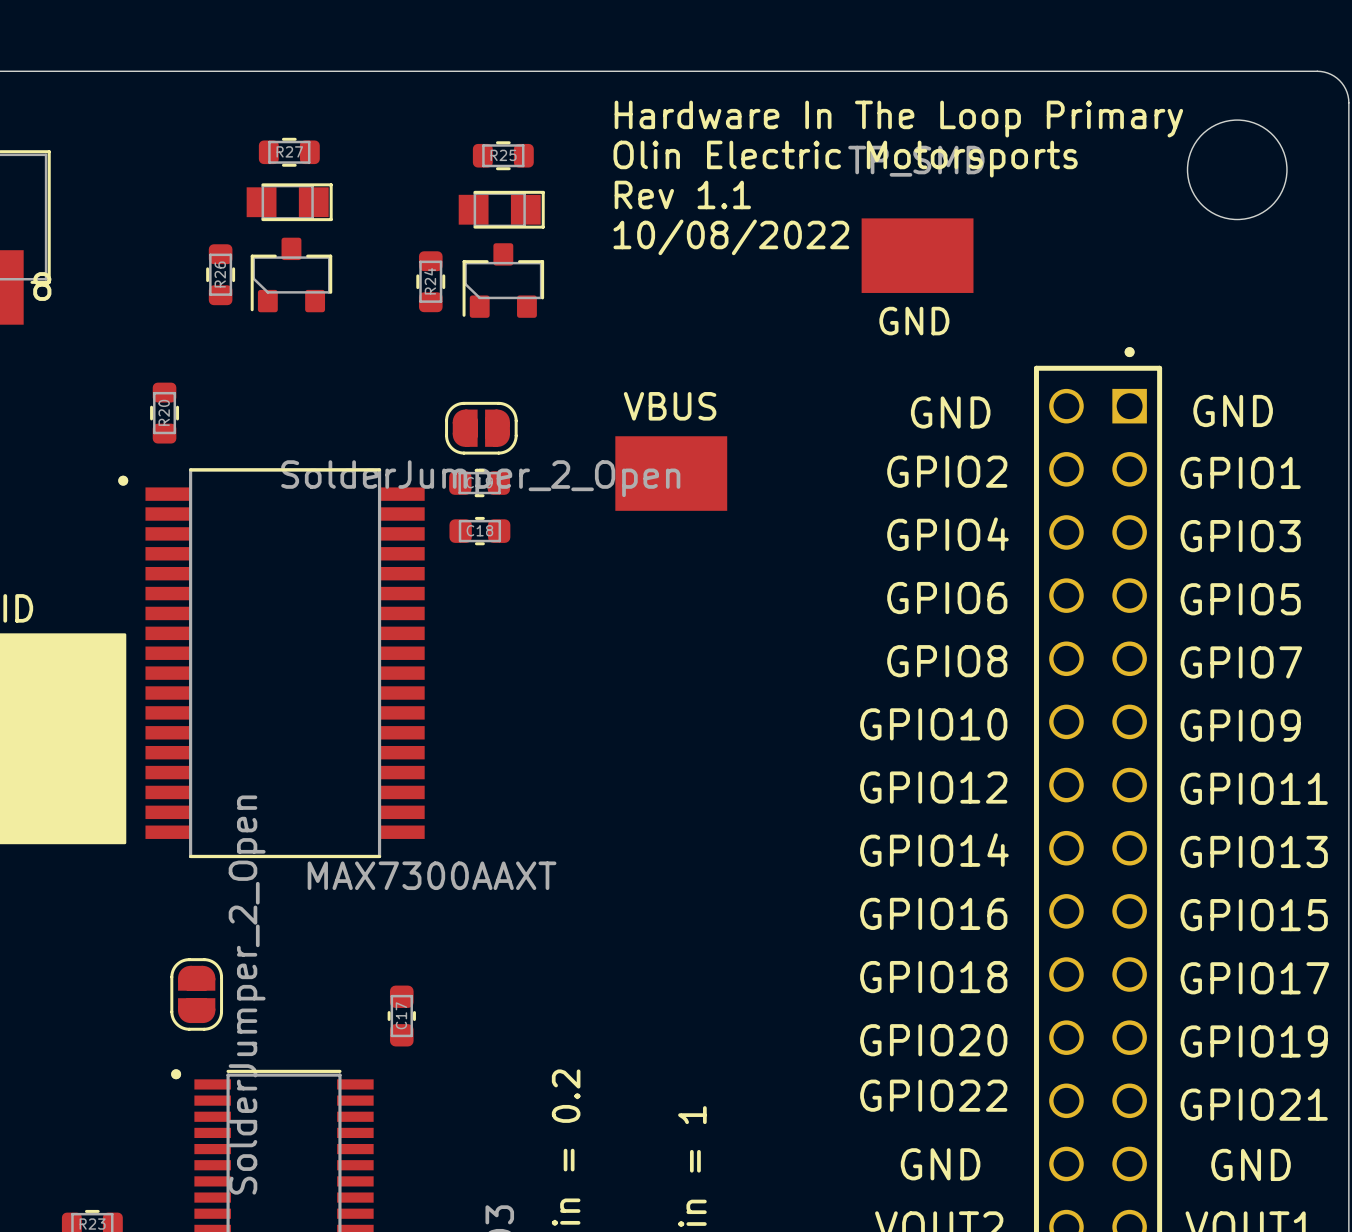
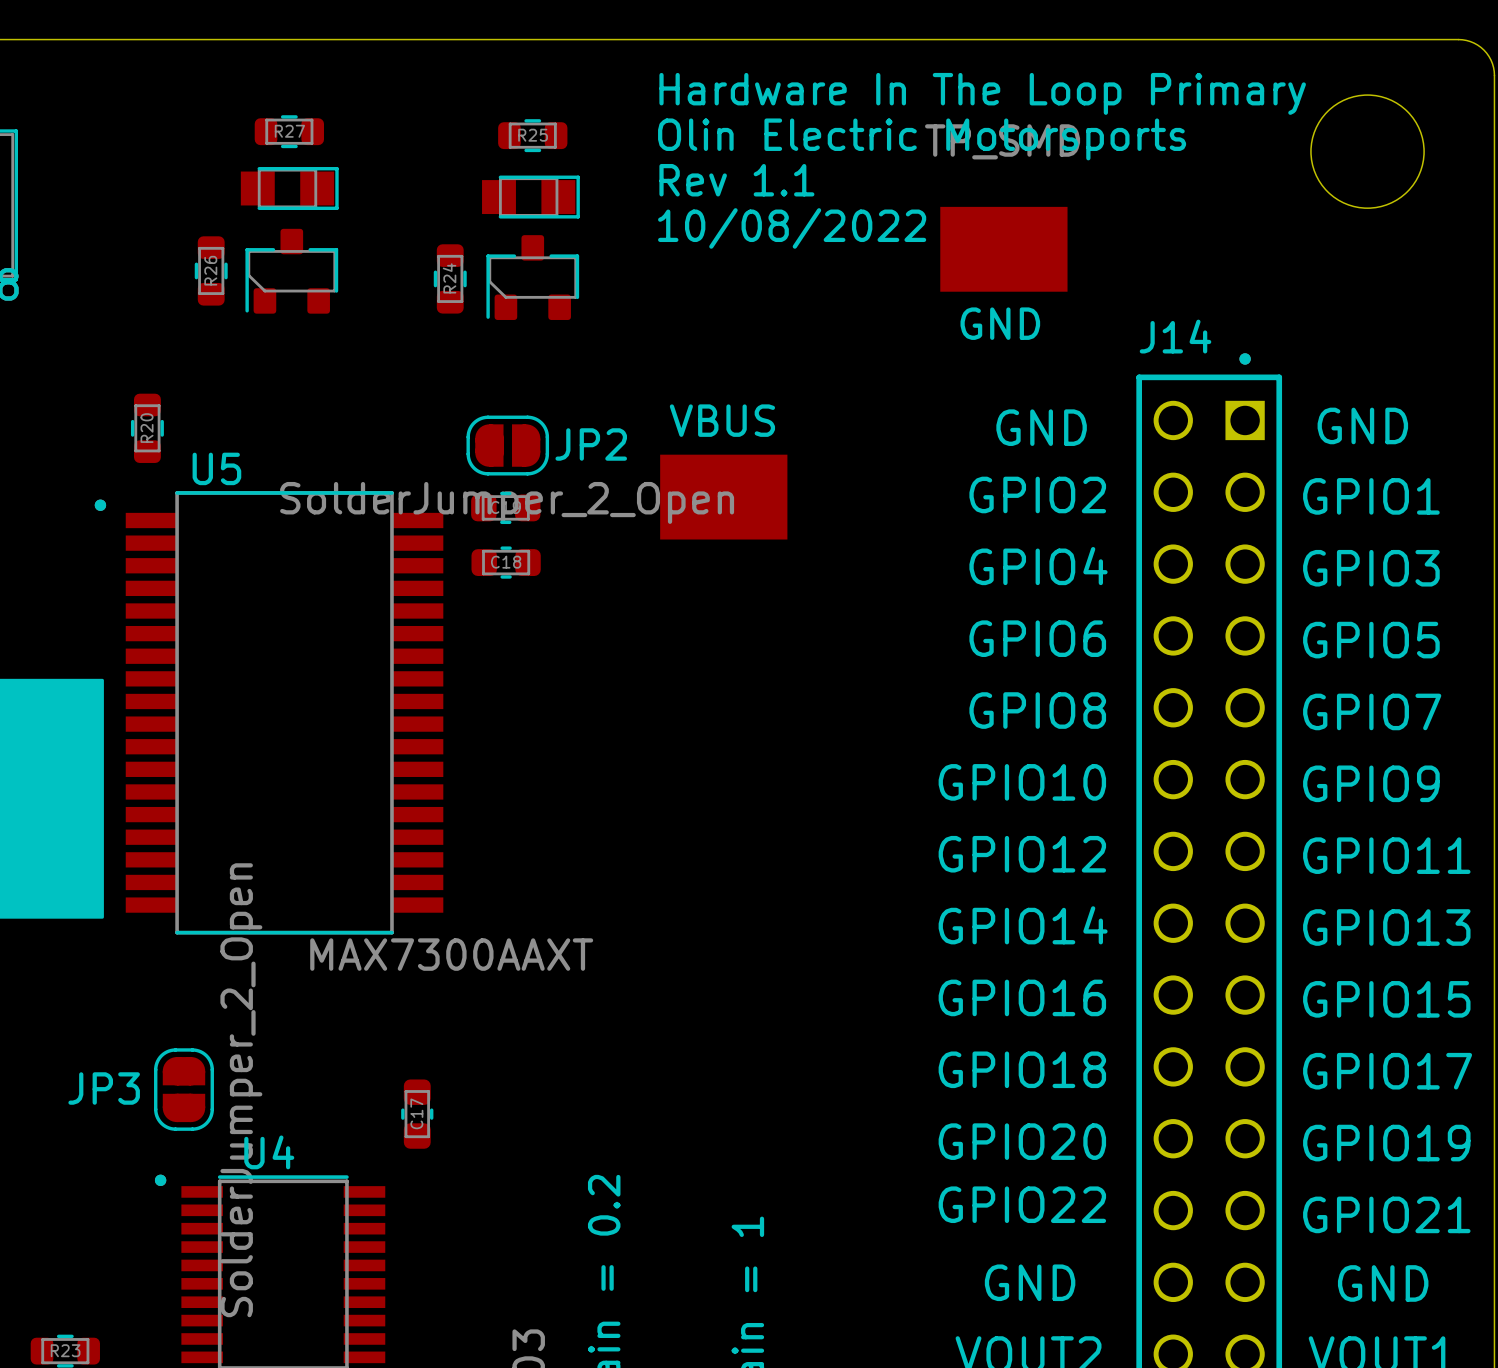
J14 name: none -> J14 (1175, 336)
JP2 name: none -> JP2 (591, 444)
U5 name: none -> U5 (216, 468)
JP3 name: none -> JP3 (104, 1088)
U4 name: none -> U4 (269, 1152)

